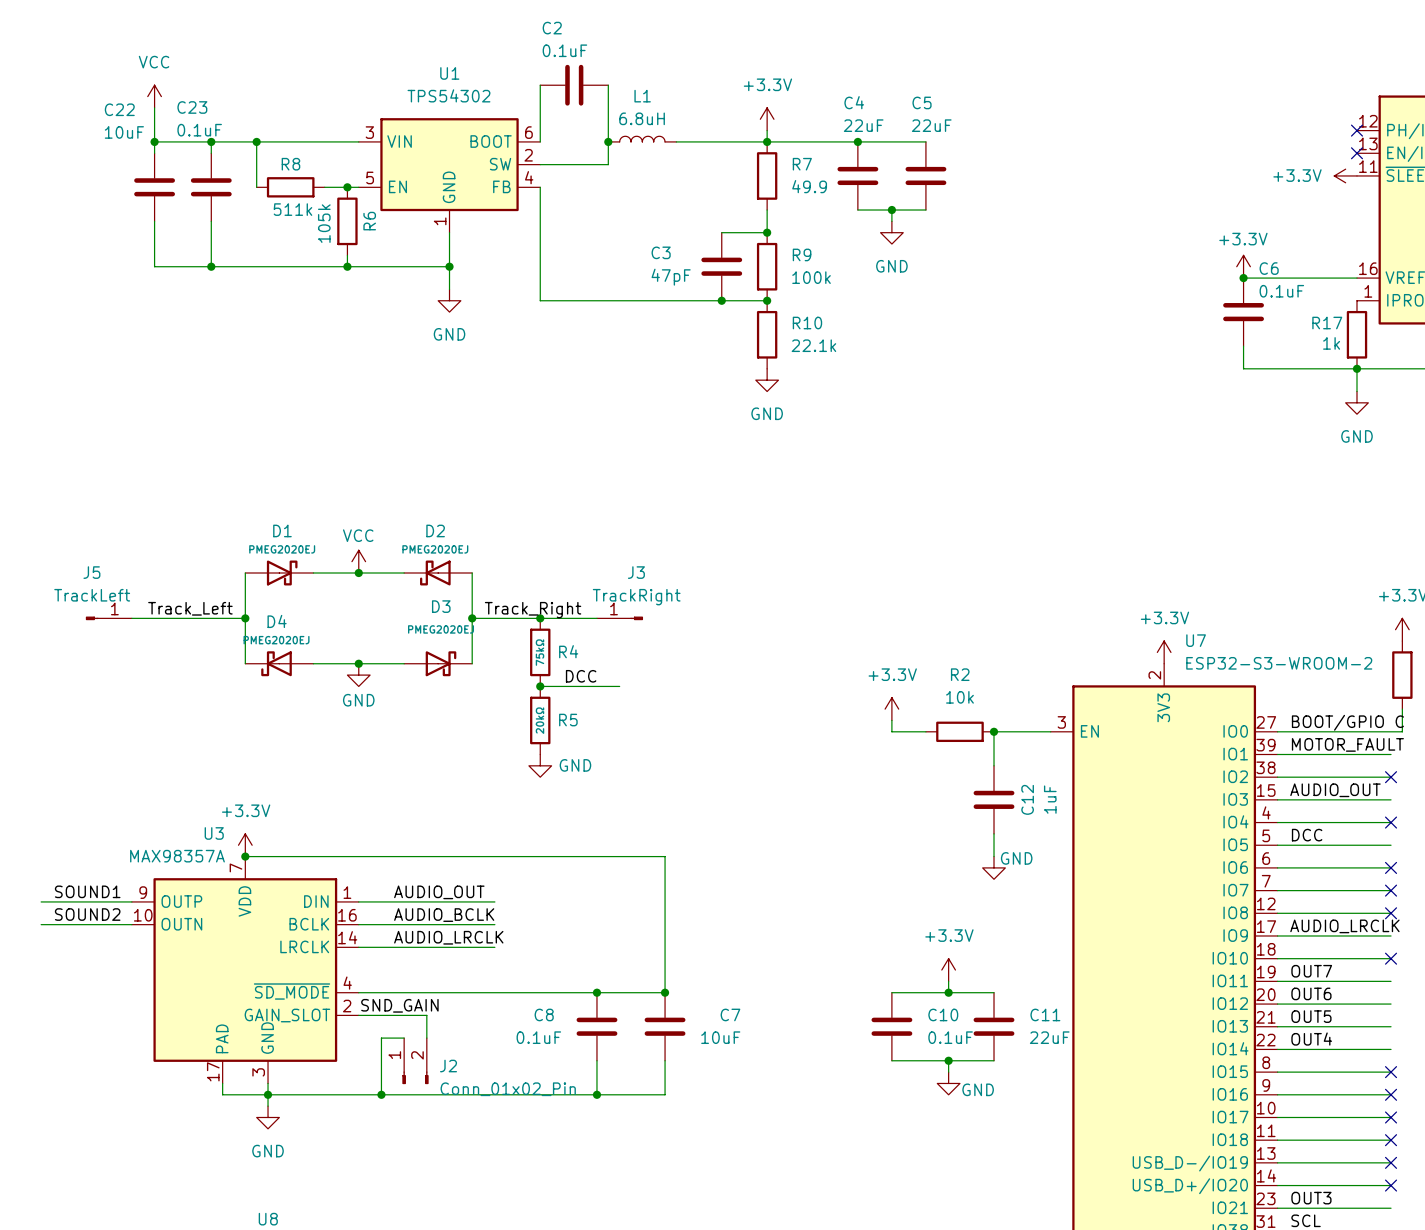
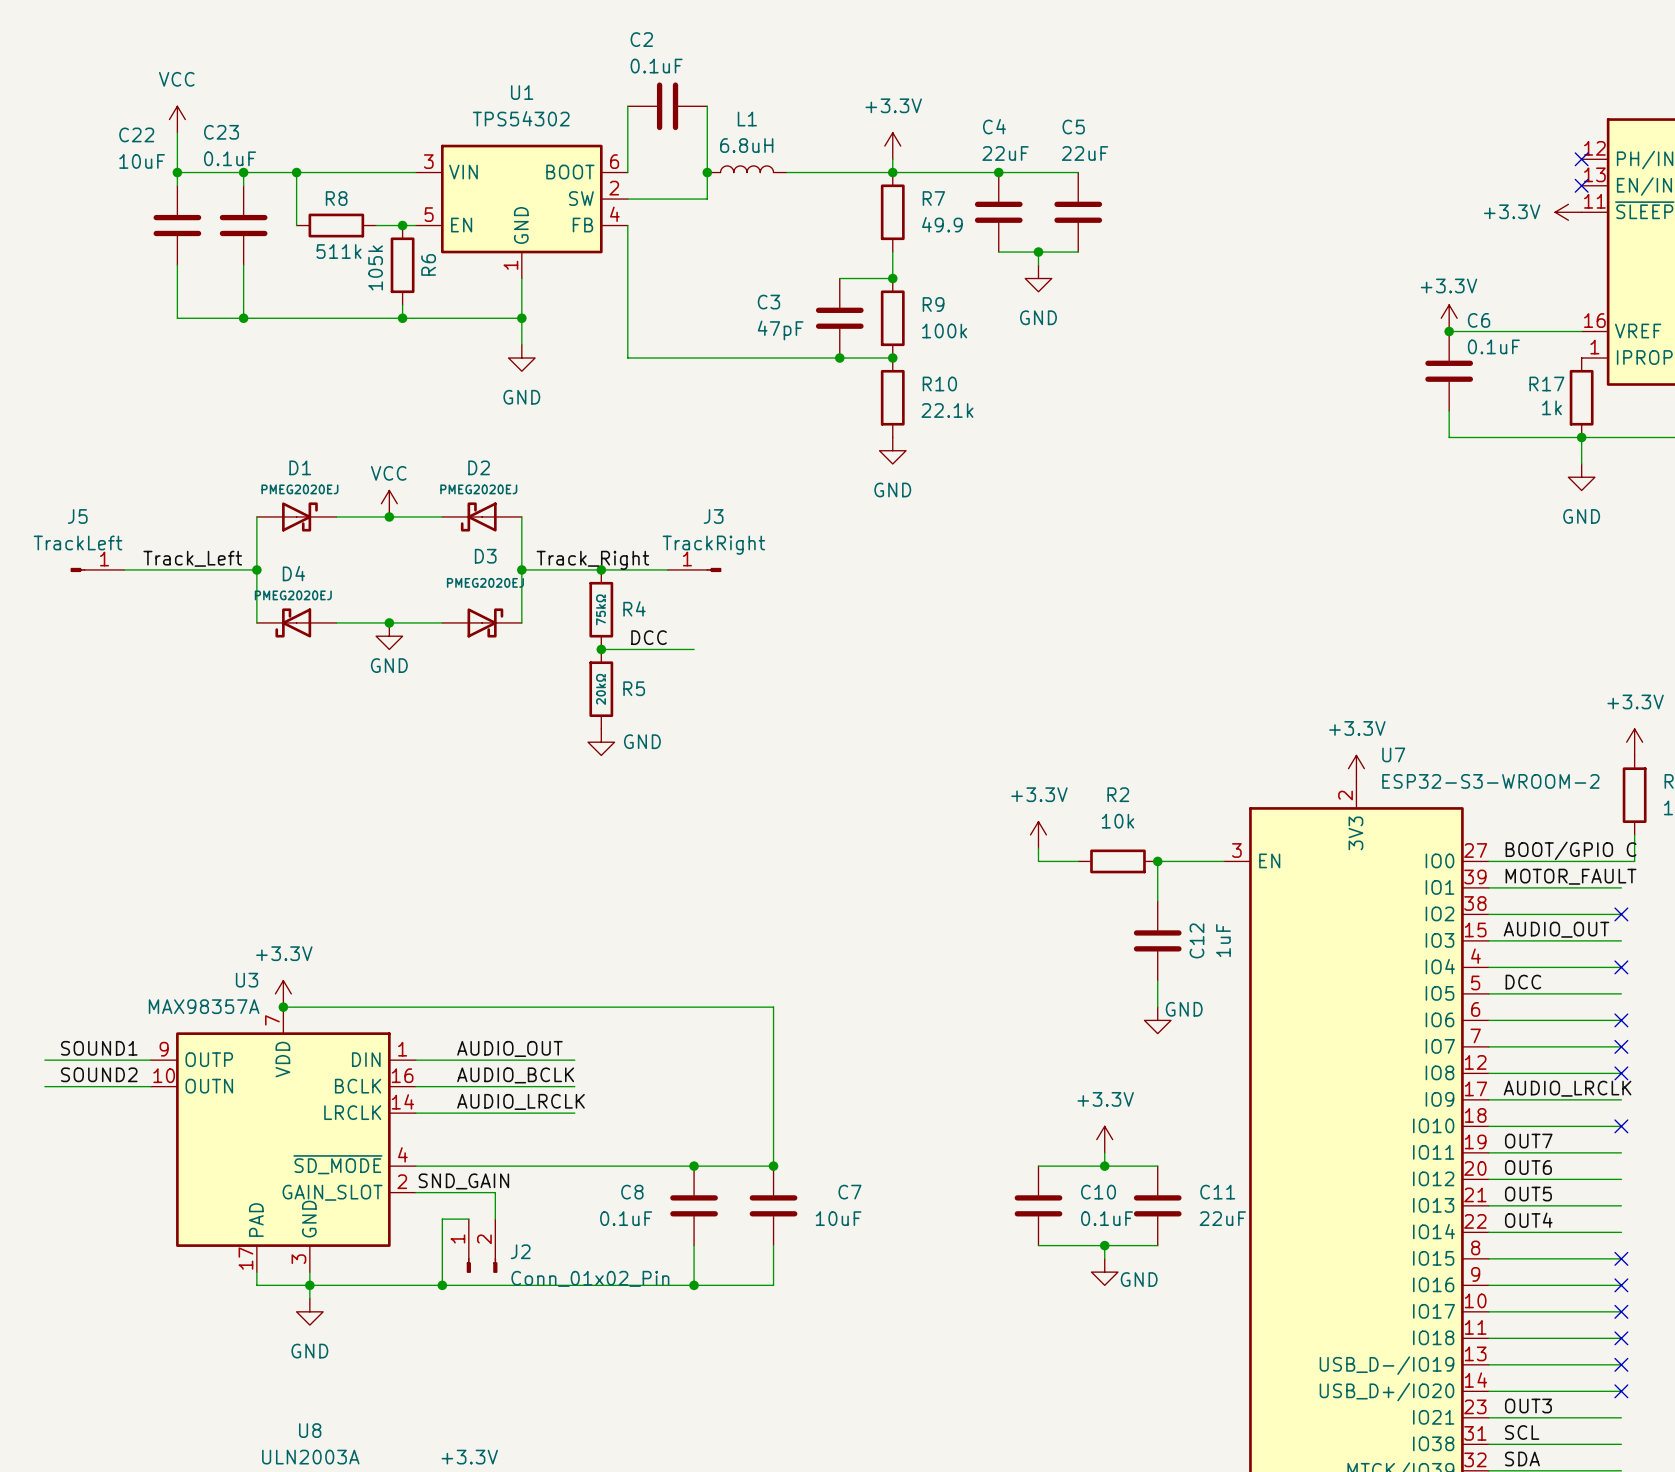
junction: none -> (389, 516)
junction: none -> (256, 569)
junction: none -> (521, 569)
junction: none -> (601, 569)
power symbol: none -> GND (389, 636)
junction: none -> (601, 649)
power symbol position: VCC (358, 561) -> VCC (389, 503)
wire: (245, 573) (245, 663) -> (256, 516) (256, 622)
D1 position: (279, 573) -> (296, 516)
wire: (313, 573) (404, 573) -> (336, 516) (442, 516)
junction position: (358, 573) -> (389, 622)
D2 position: (438, 573) -> (482, 516)
wire: (472, 573) (472, 663) -> (521, 516) (521, 622)
label position: Track_Left (190, 608) -> Track_Left (192, 558)
label position: Track_Right (533, 610) -> Track_Right (592, 560)
J5 position: (108, 618) -> (97, 569)
wire: (131, 618) (245, 618) -> (124, 569) (256, 569)
junction: (245, 618) -> none
wire: (472, 618) (596, 618) -> (521, 569) (667, 569)
junction: (472, 618) -> none
junction: (540, 618) -> none
J3 position: (620, 618) -> (694, 569)
power symbol: none -> GND (601, 742)
R4 position: (540, 652) -> (601, 609)
D4 position: (279, 663) -> (296, 622)
wire: (313, 663) (404, 663) -> (336, 622) (442, 622)
junction: (358, 663) -> none
D3 position: (438, 663) -> (482, 622)
power symbol: GND (358, 675) -> none
label position: DCC (581, 676) -> DCC (649, 637)
wire: (540, 686) (619, 686) -> (601, 649) (694, 649)
junction: (540, 686) -> none
R5 position: (540, 720) -> (601, 689)
power symbol: GND (540, 765) -> none

